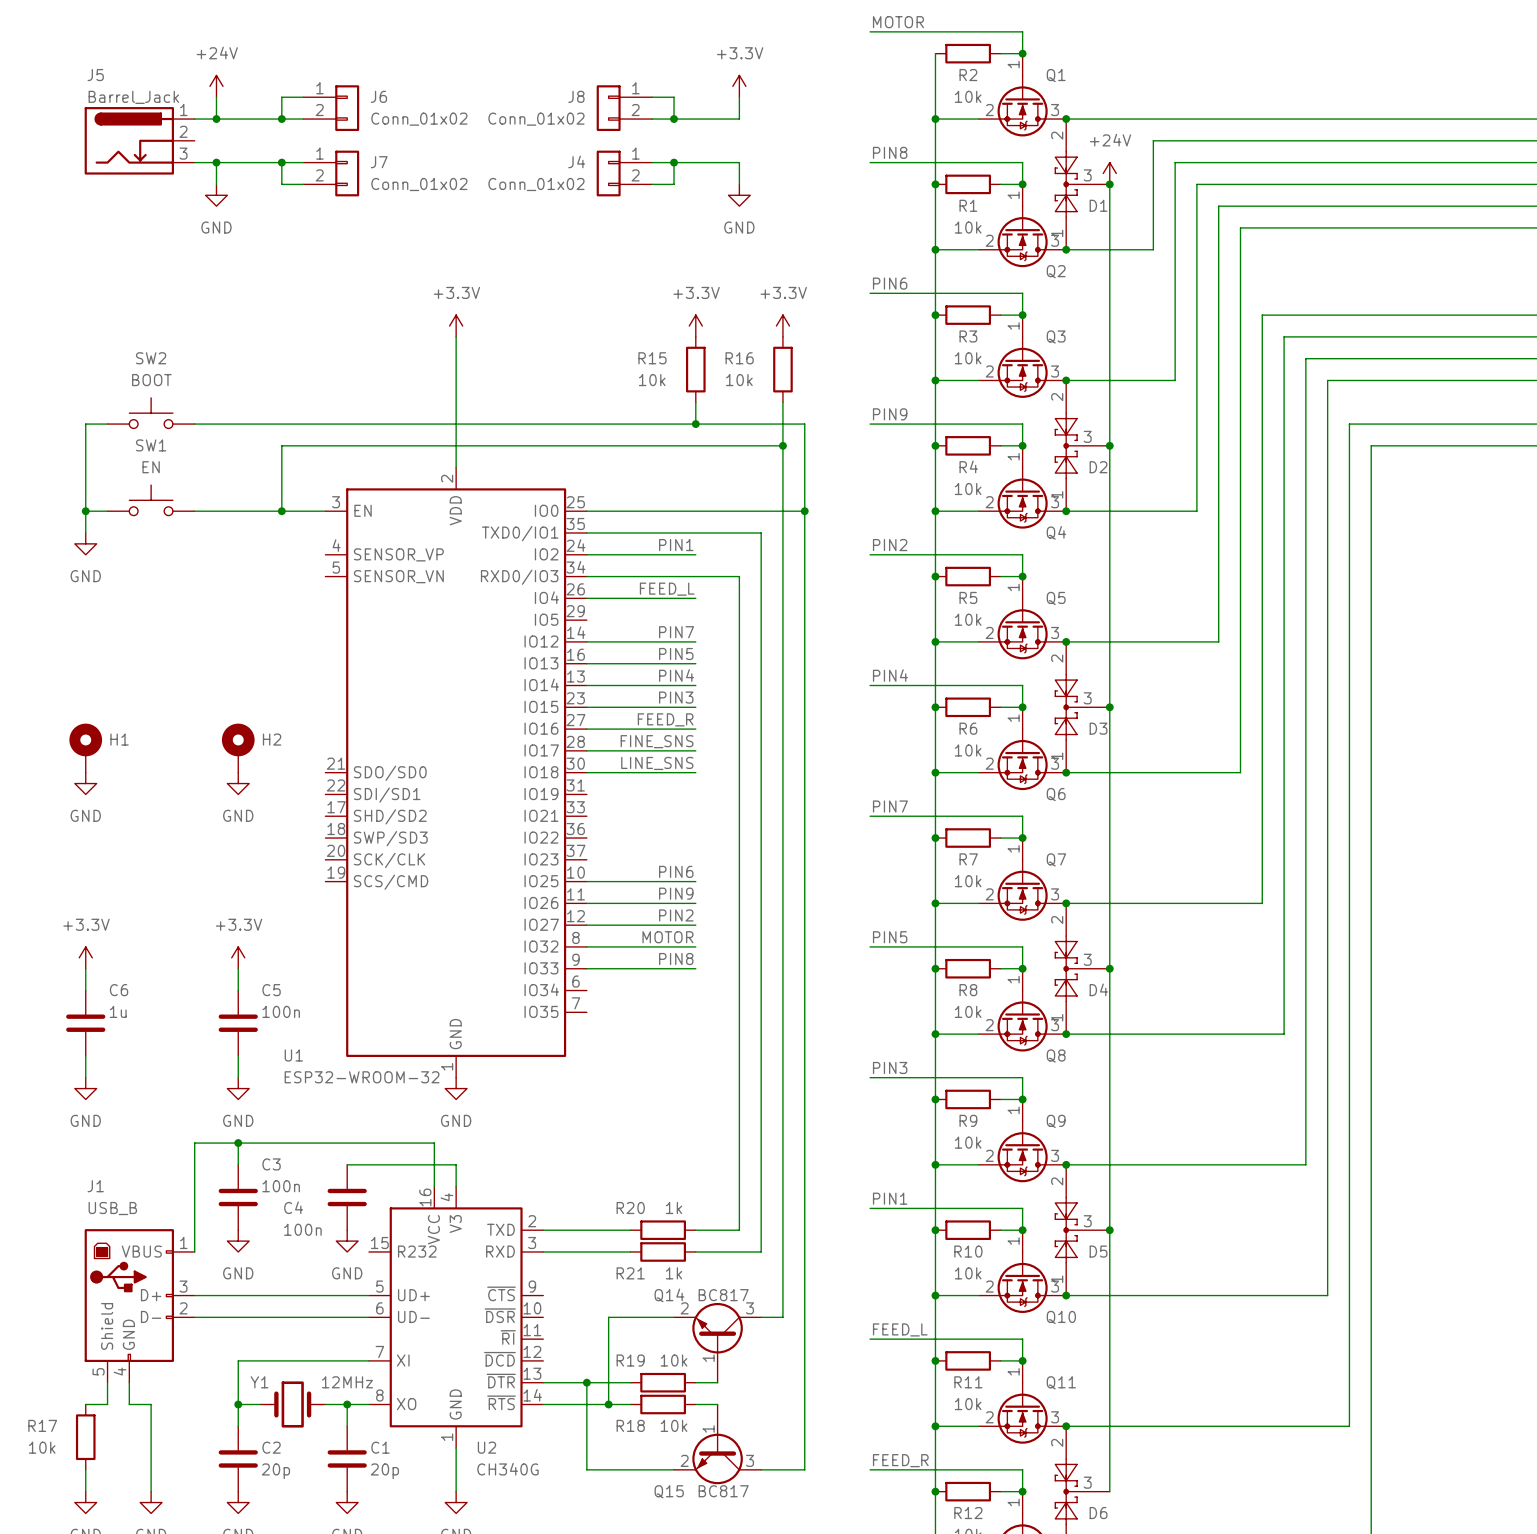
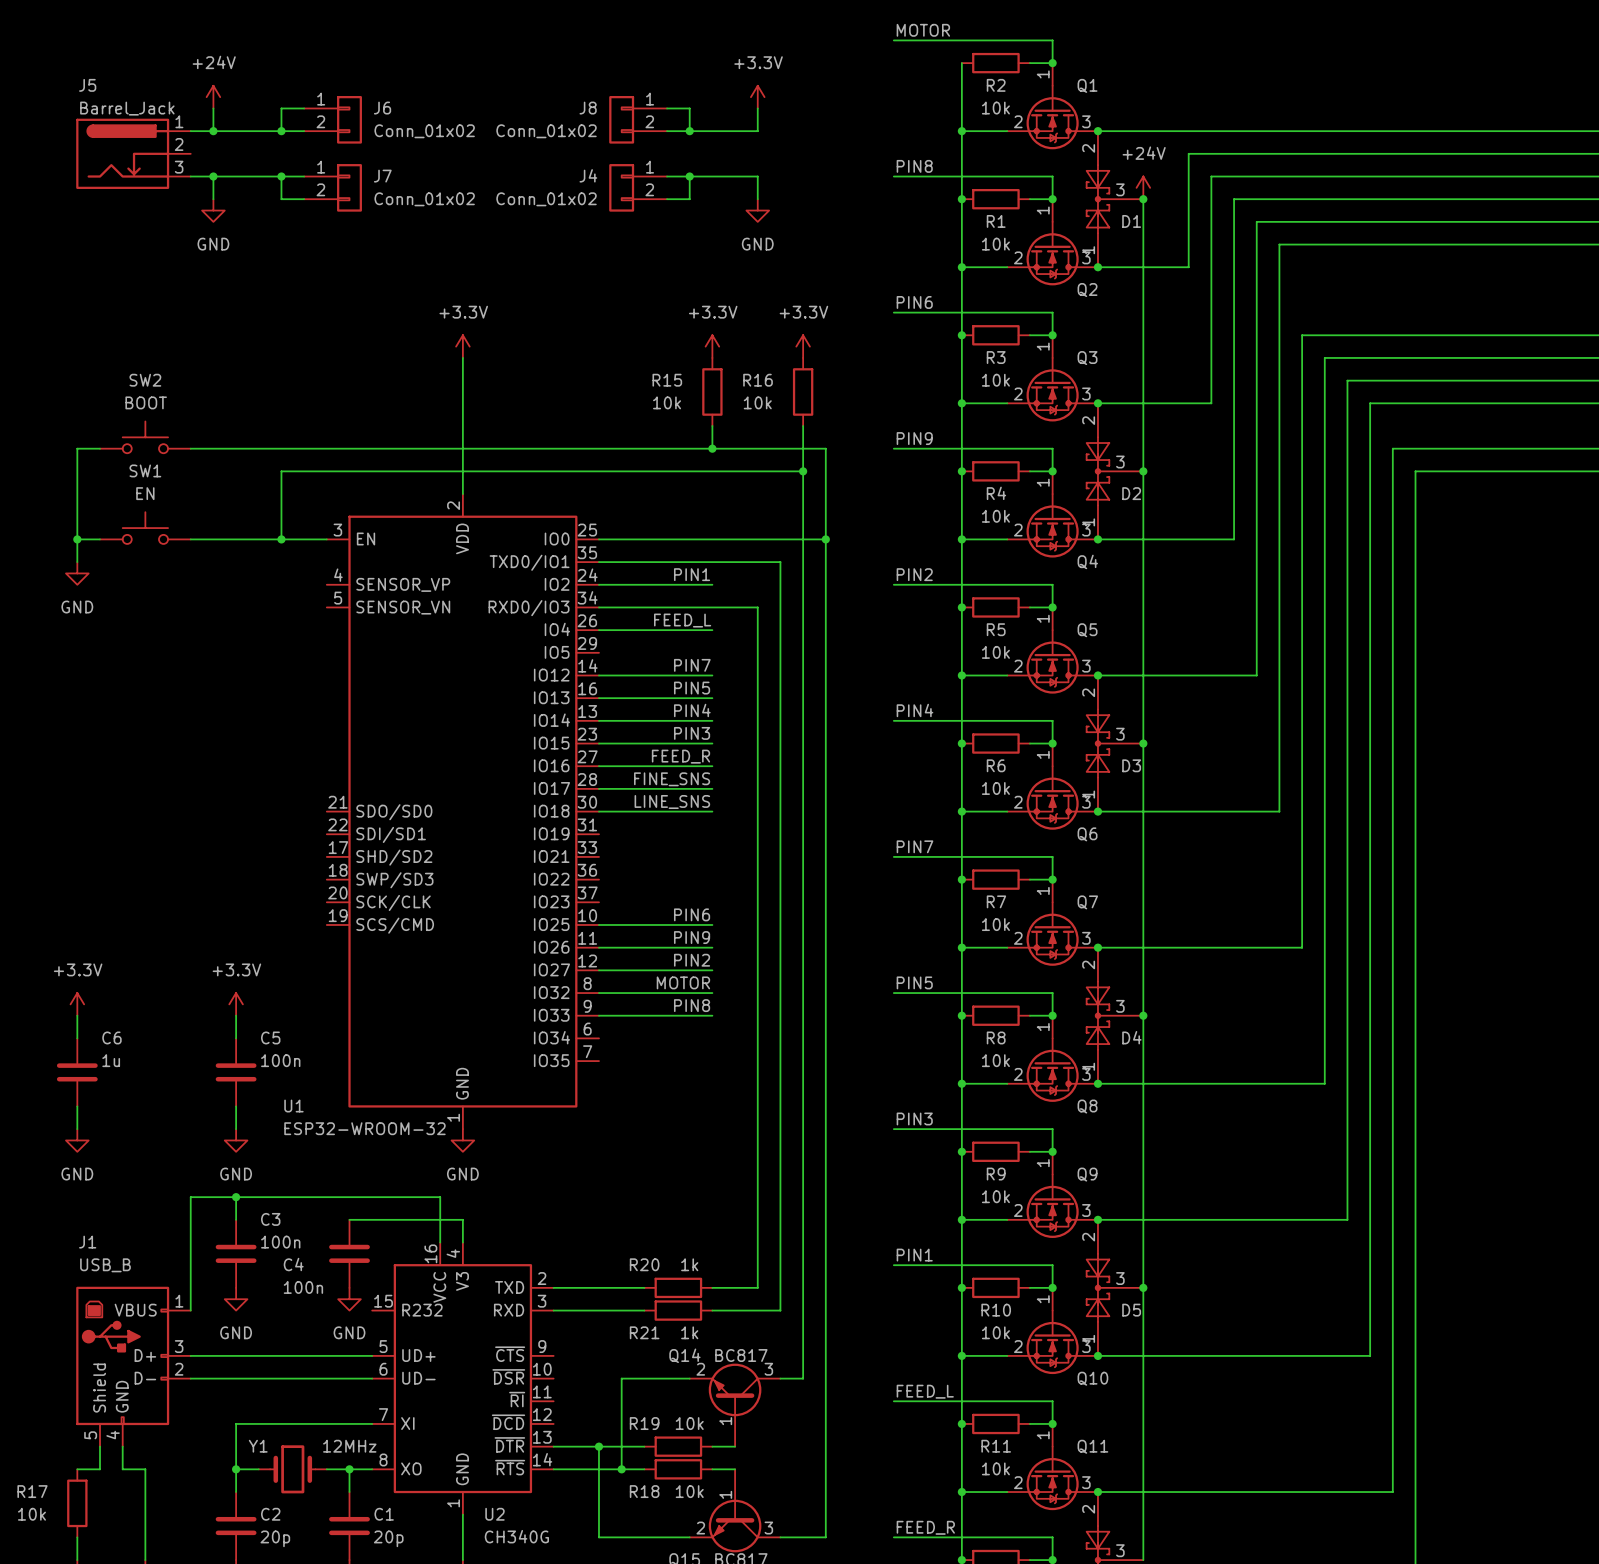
H1: (85, 748) -> none
H2: (238, 748) -> none
power symbol: GND (85, 783) -> none
power symbol: GND (238, 783) -> none

